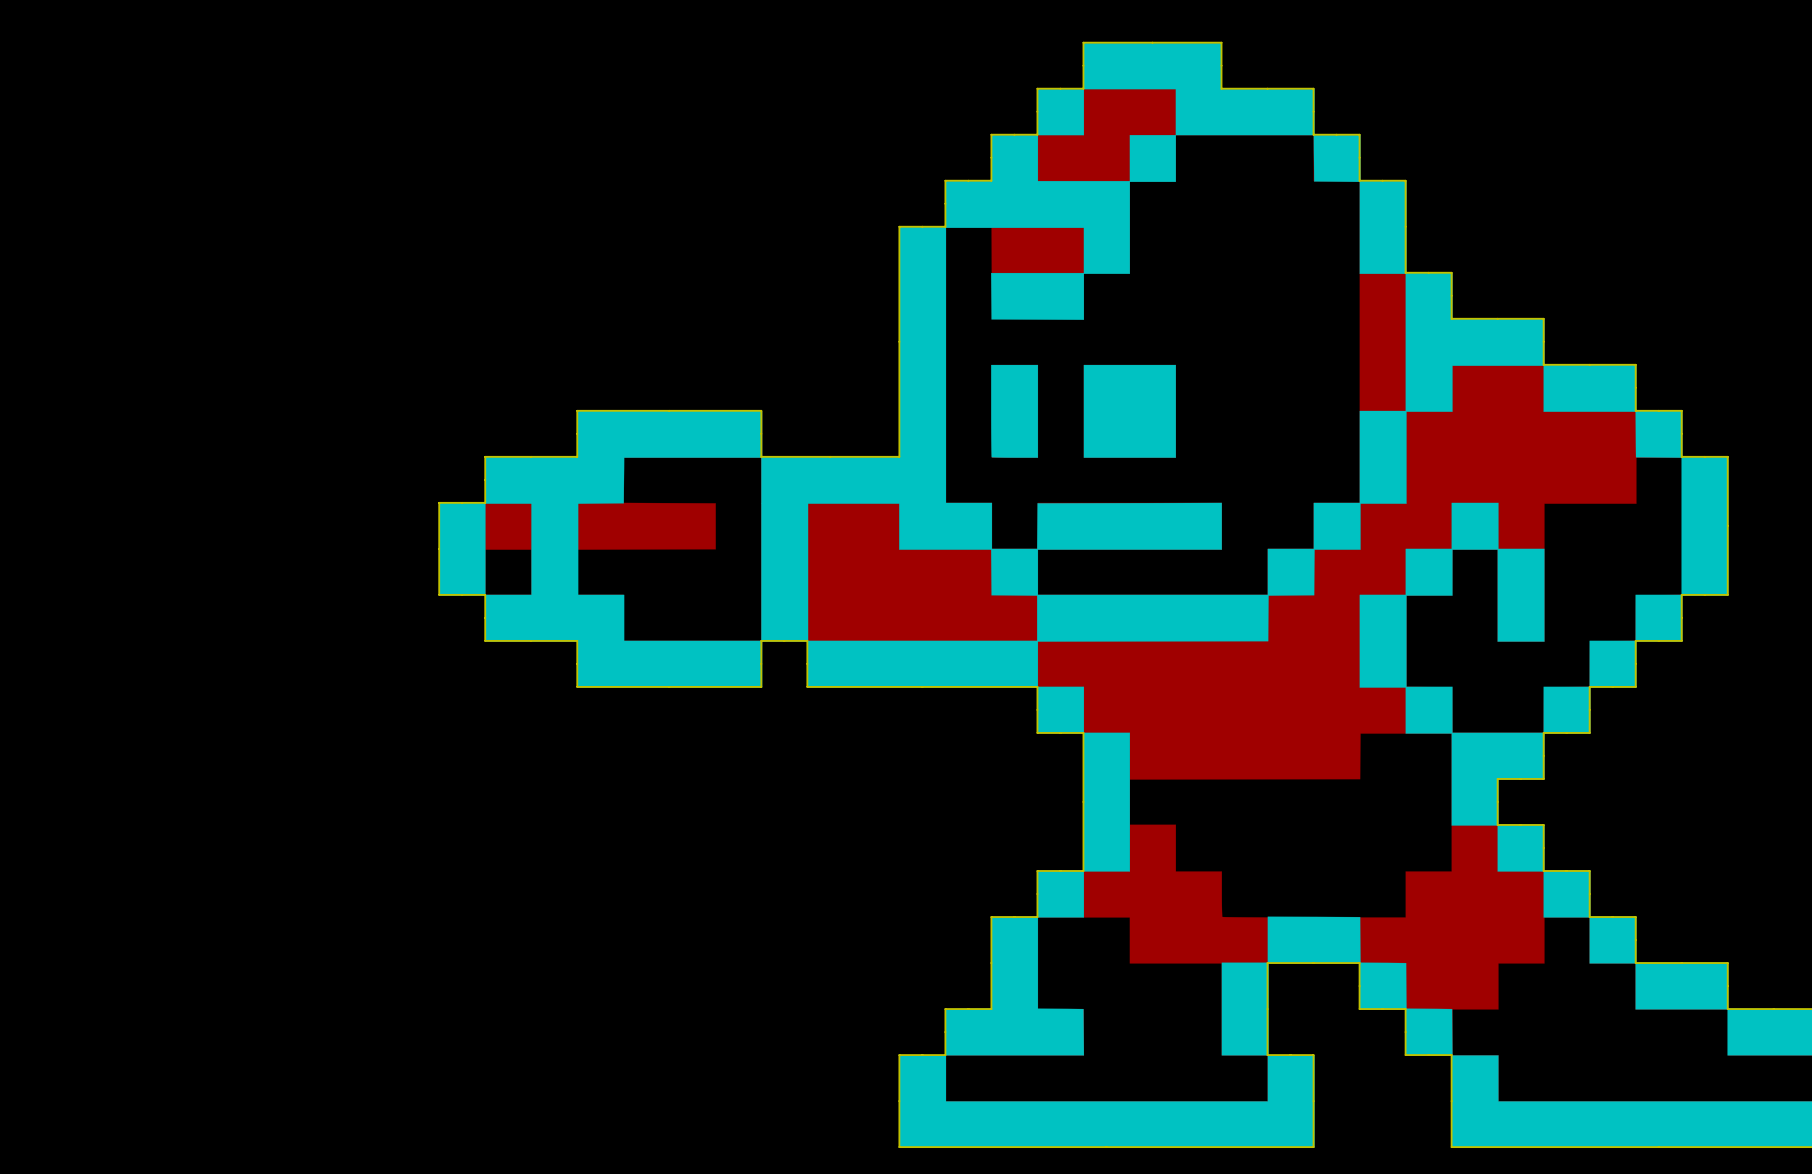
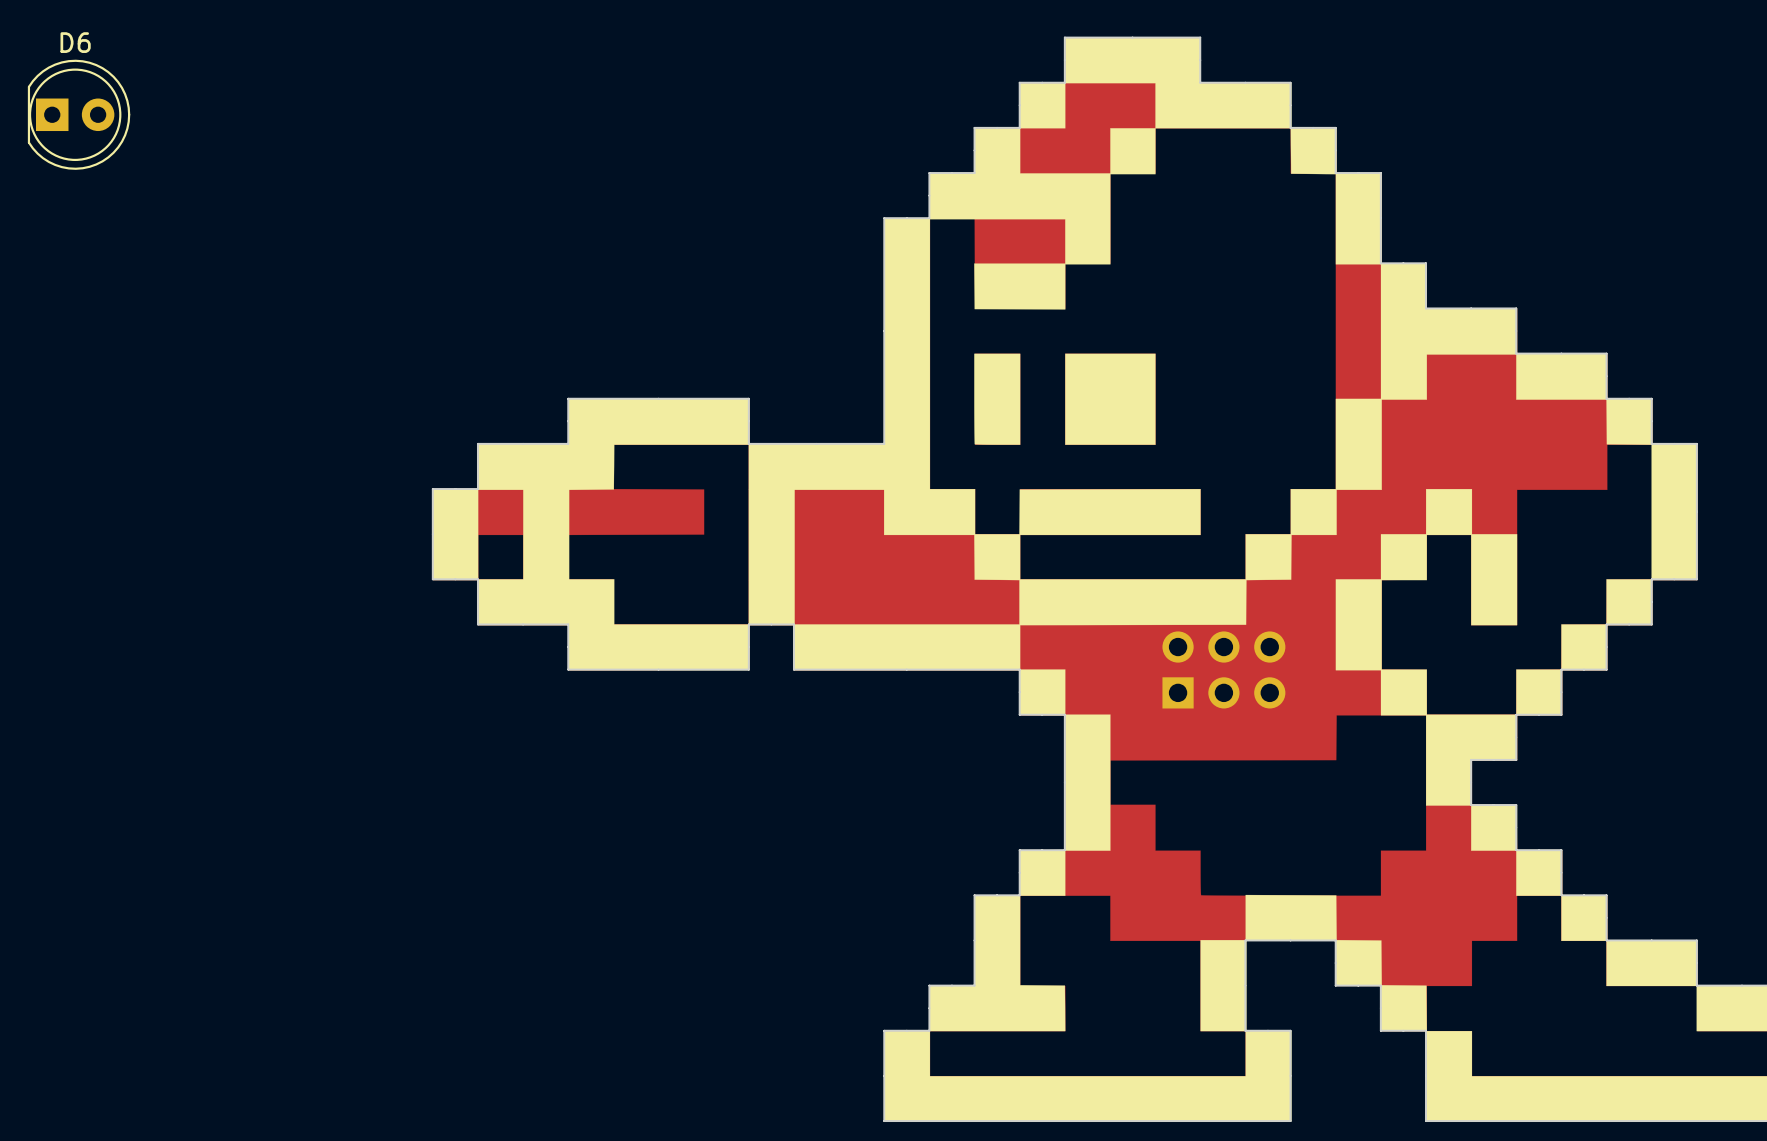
D6: none -> (79, 114)
part: none -> (1223, 669)

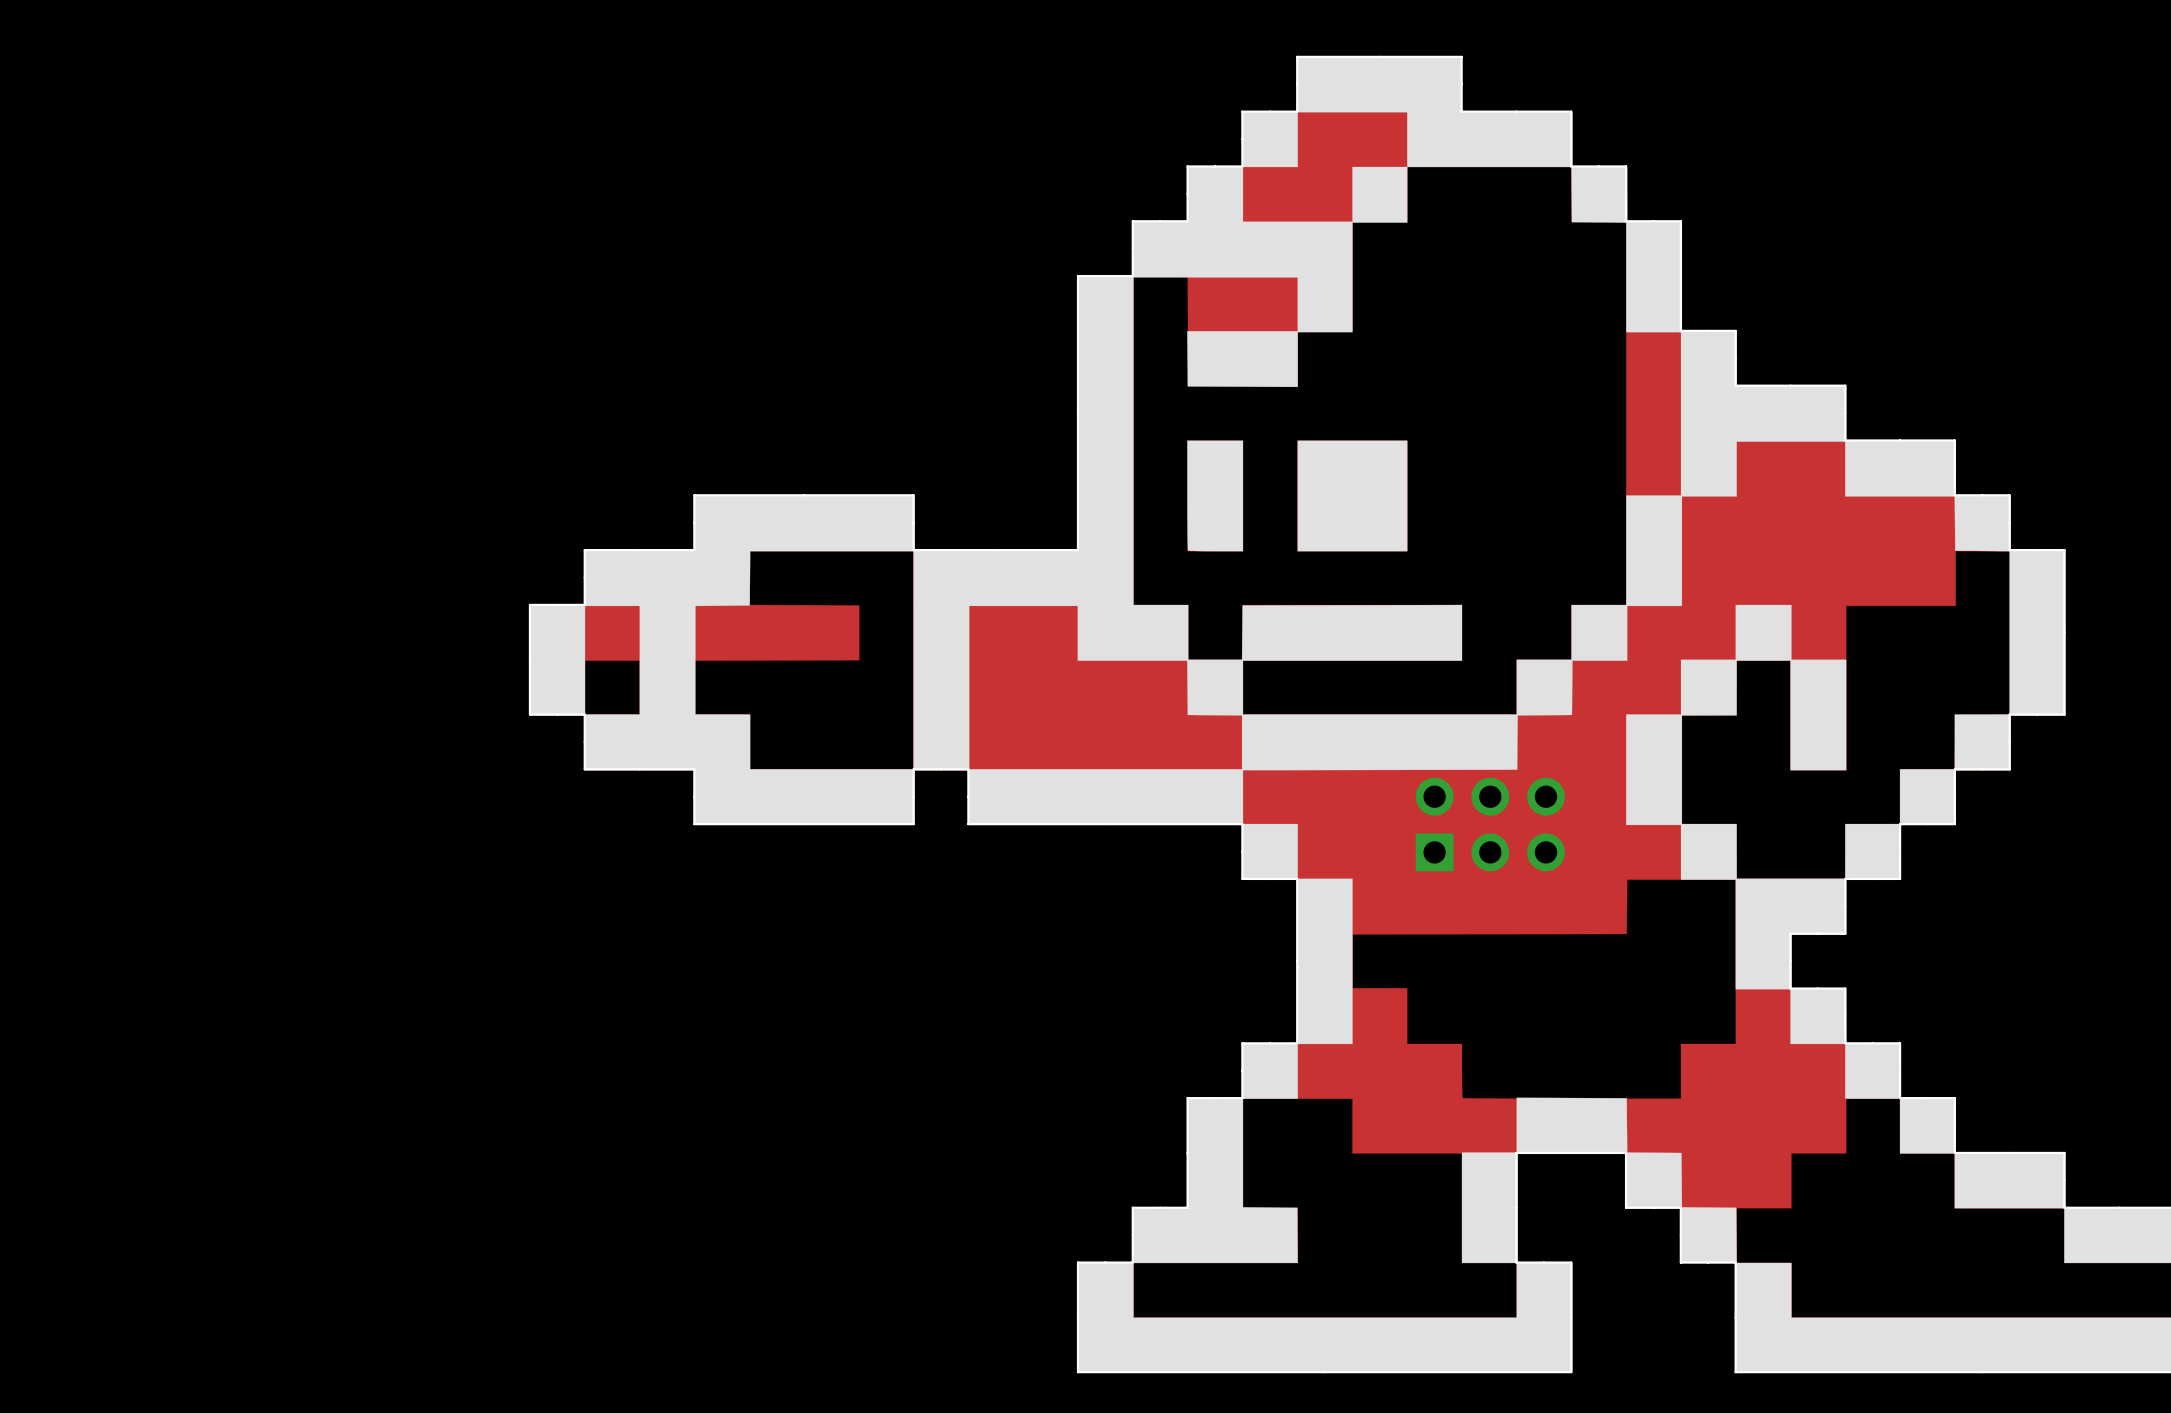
D6: (79, 114) -> none

